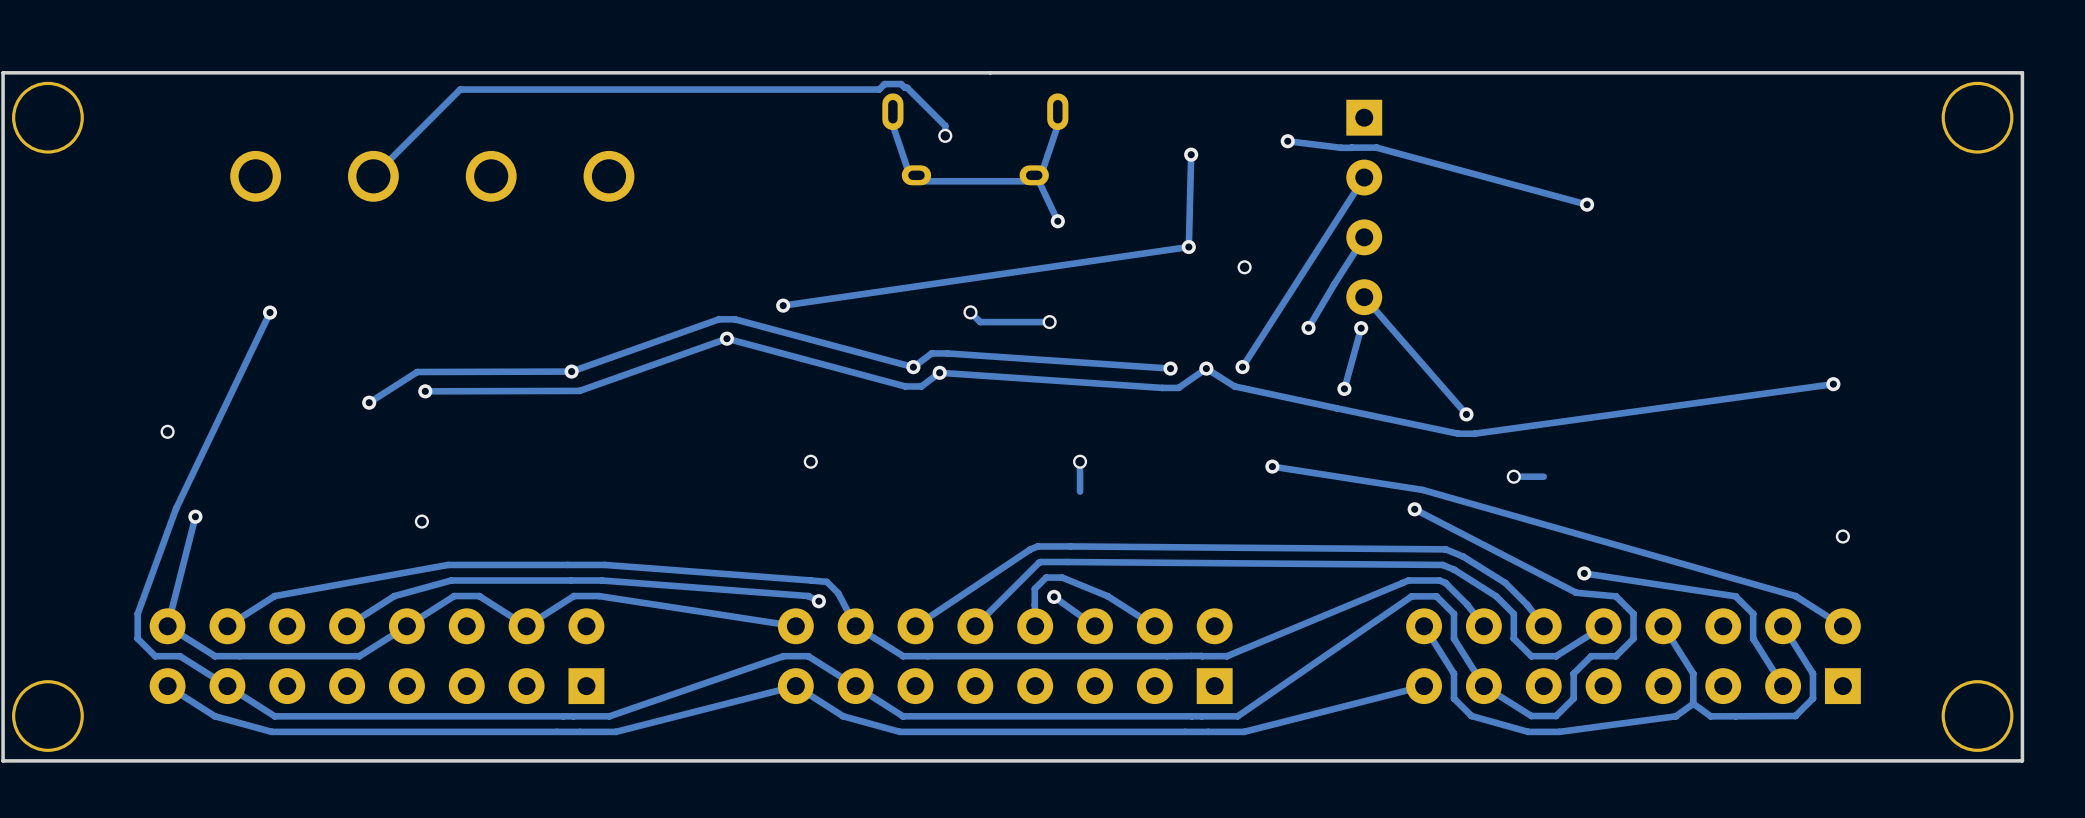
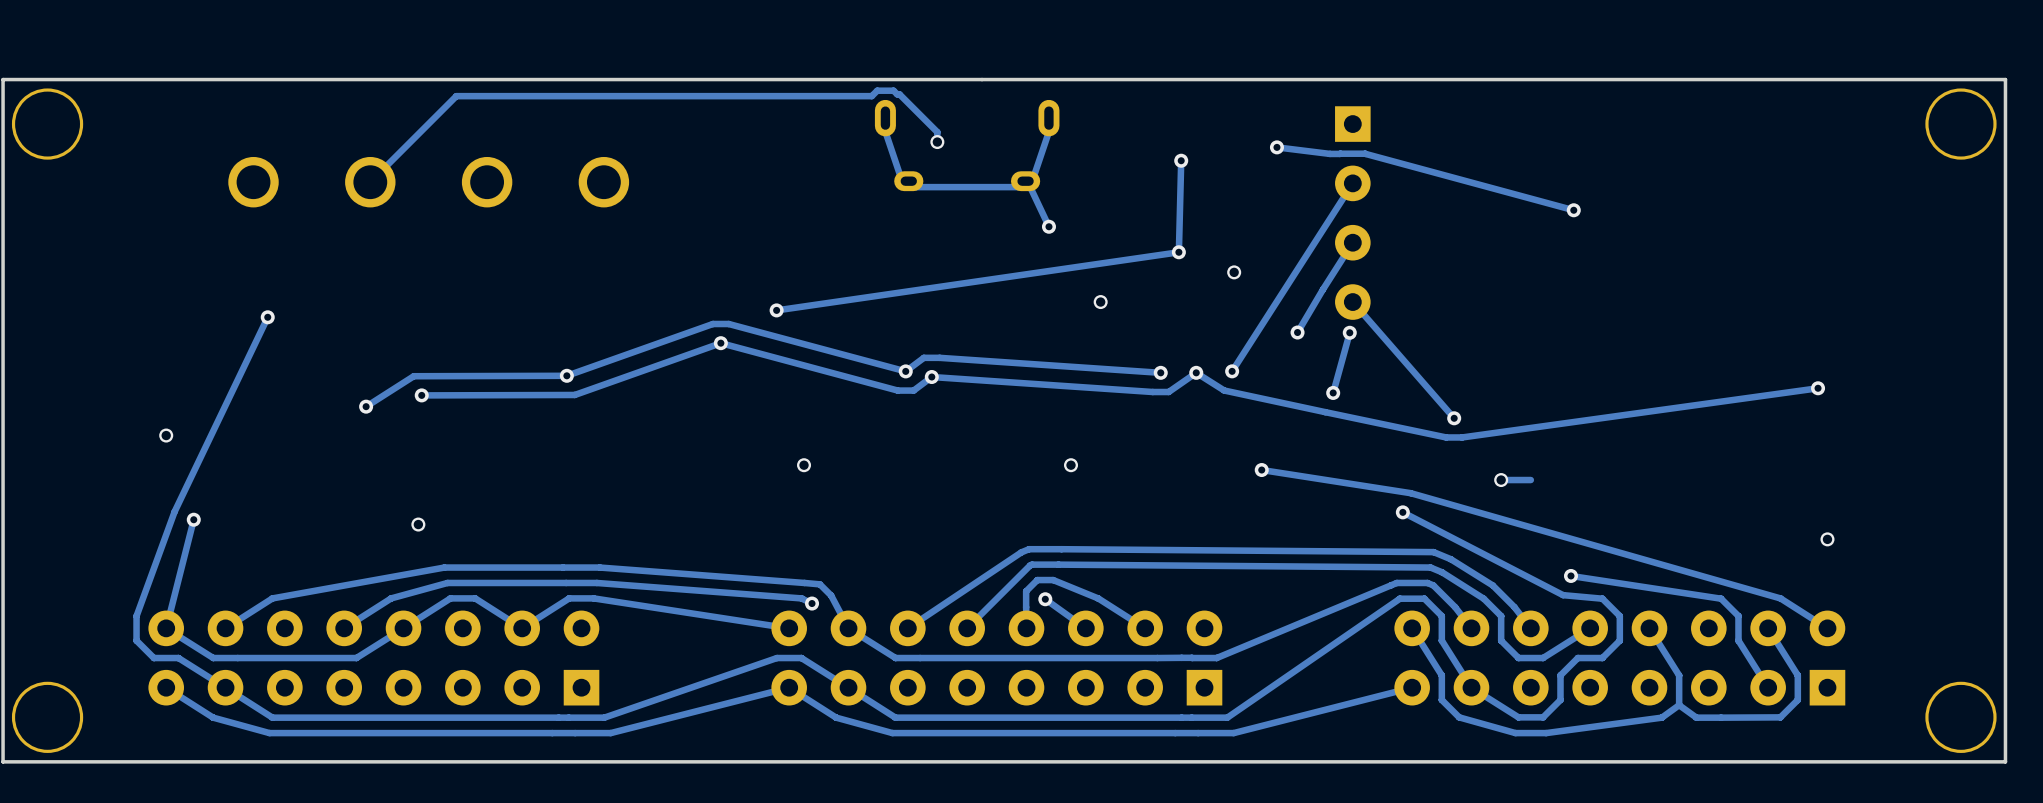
track: (970, 312) (980, 322) (1049, 322) -> none
via: (970, 312) -> none
via position: (1049, 322) -> (1100, 302)
track: (1080, 461) (1080, 491) -> none

